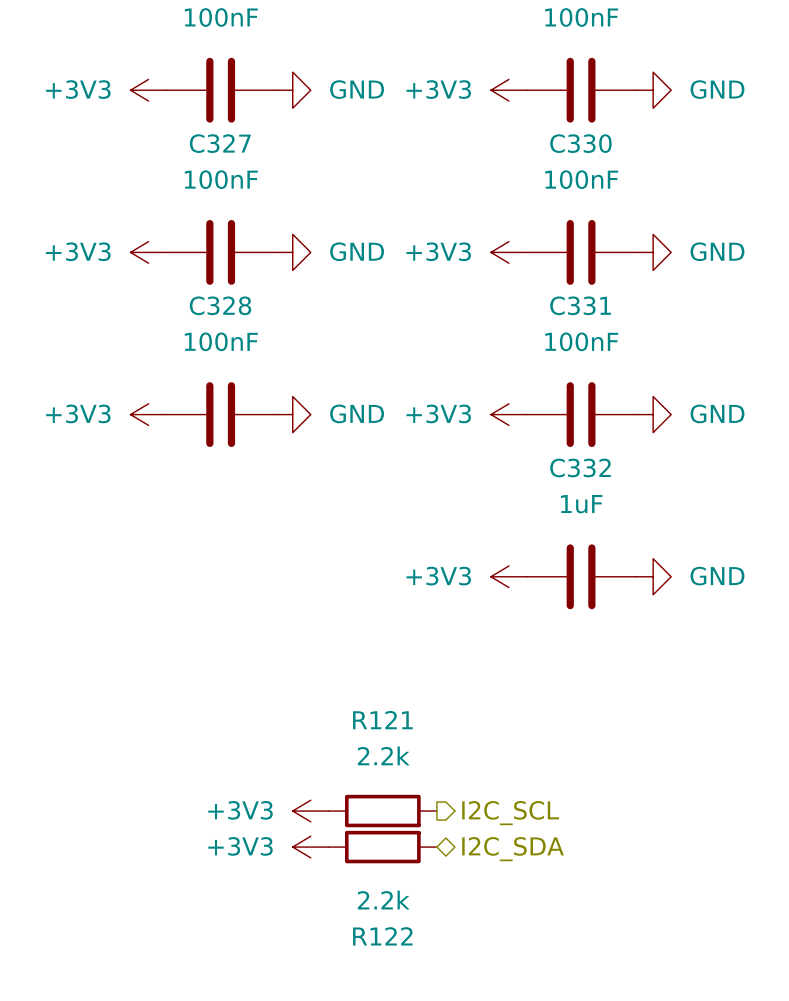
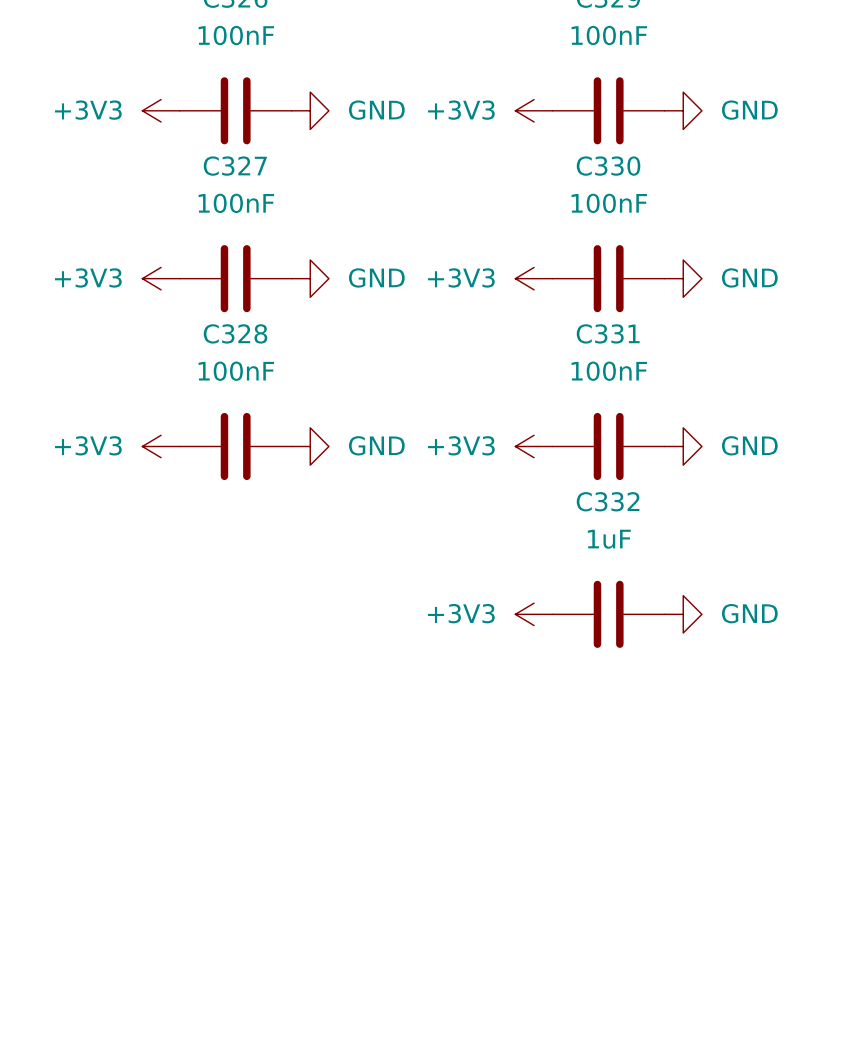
power symbol: +3V3 (310, 811) -> none
R121: 2.2k (382, 811) -> none
hierarchical label: I2C_SCL (510, 813) -> none
power symbol: +3V3 (310, 847) -> none
R122: 2.2k (382, 847) -> none
hierarchical label: I2C_SDA (513, 849) -> none

